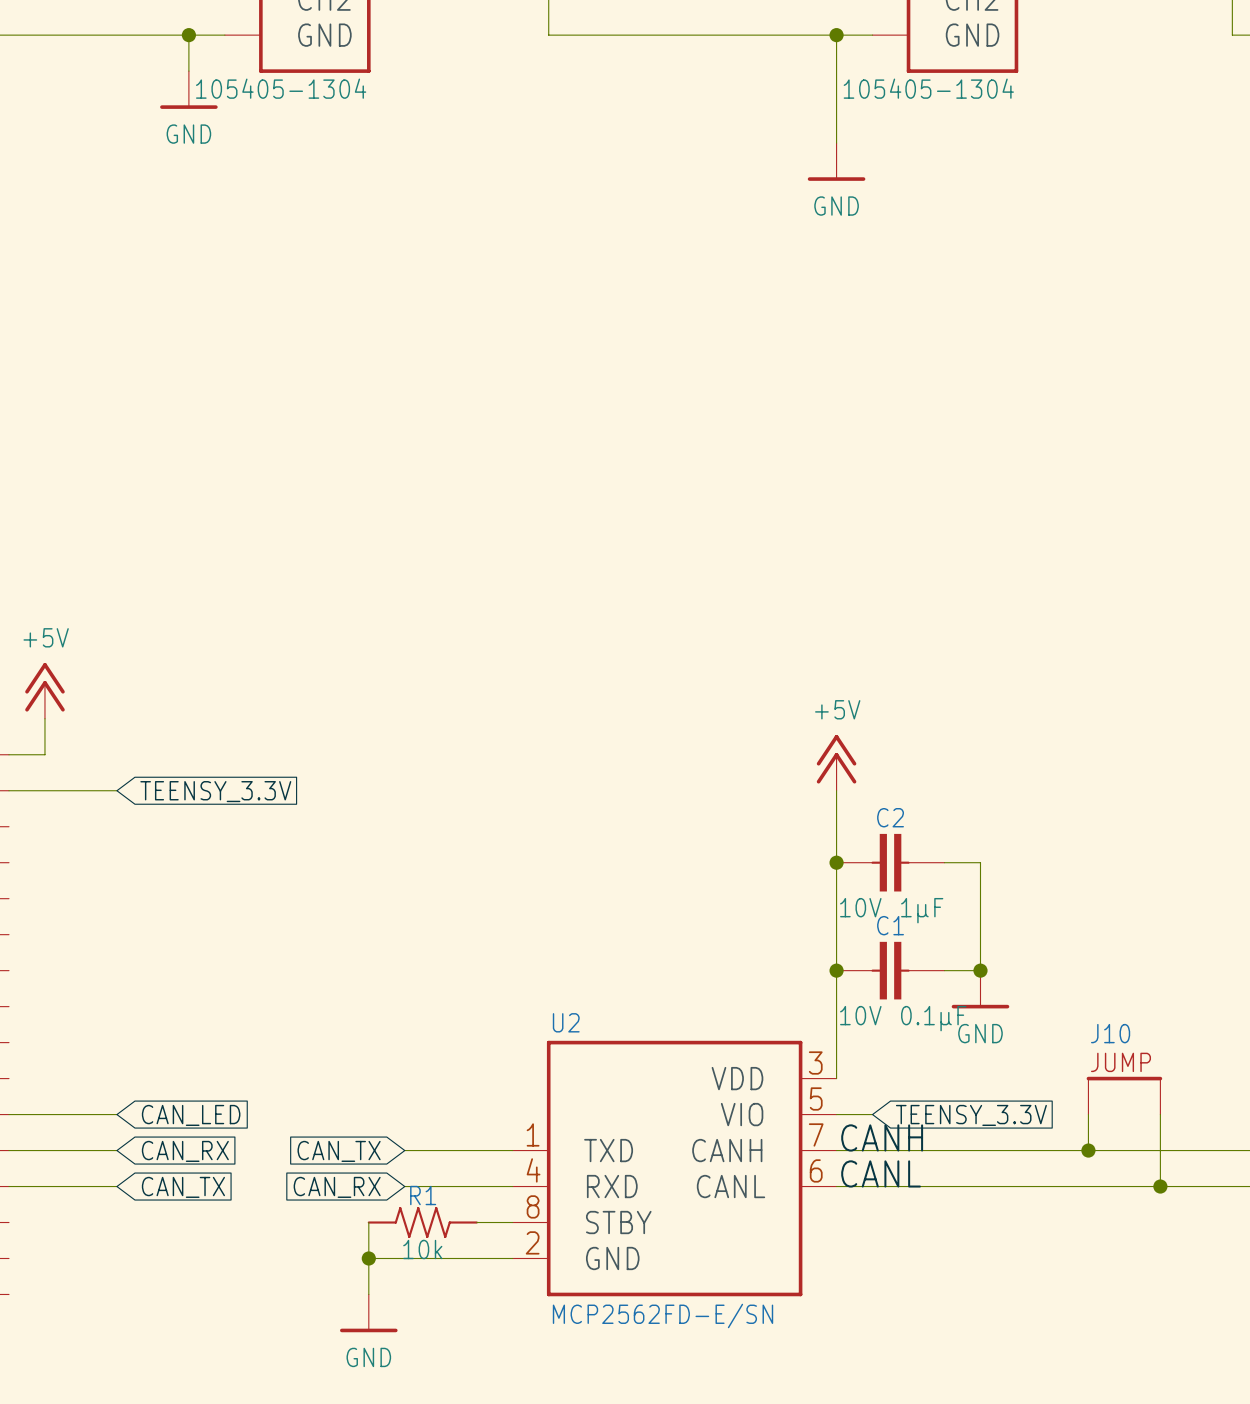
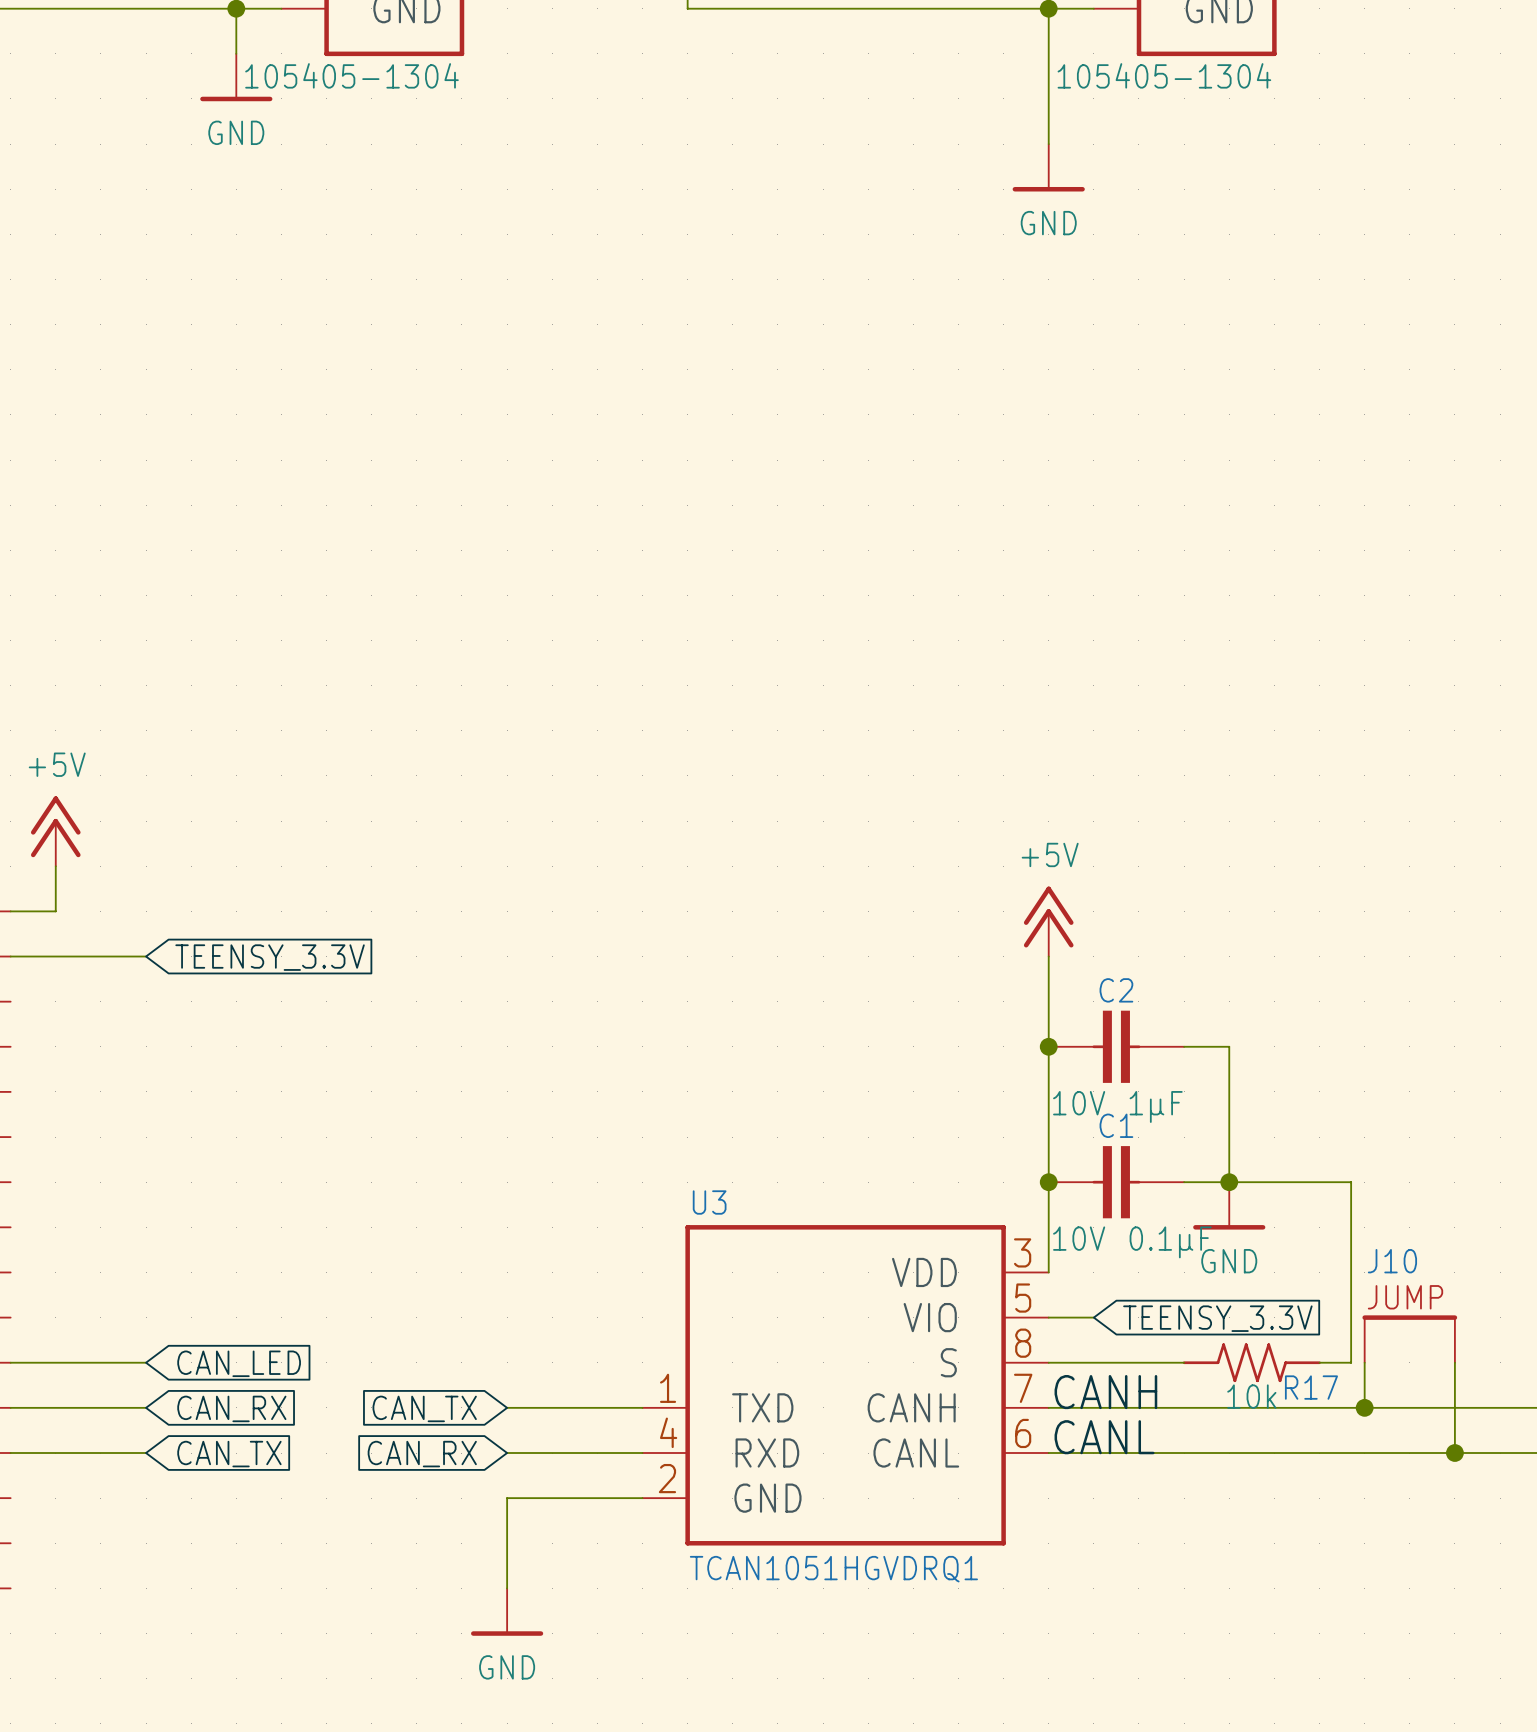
wire: none -> (1229, 1182) (1351, 1182) (1351, 1362) (1319, 1362)
wire: (836, 1042) (836, 1078) -> (1093, 1317) (1048, 1317)
wire: none -> (1093, 1362) (1184, 1362)
R17: none -> (1251, 1362)
global label position: TEENSY_3.3V (971, 1115) -> TEENSY_3.3V (1217, 1318)
U3: none -> (845, 1385)
U2: (674, 1168) -> none
wire: (368, 1222) (368, 1294) -> none
R1: (422, 1222) -> none
wire: none -> (597, 1498) (507, 1498) (507, 1588)
wire: (368, 1258) (512, 1258) -> none
junction: (368, 1258) -> none
power symbol position: GND (368, 1313) -> GND (507, 1612)

